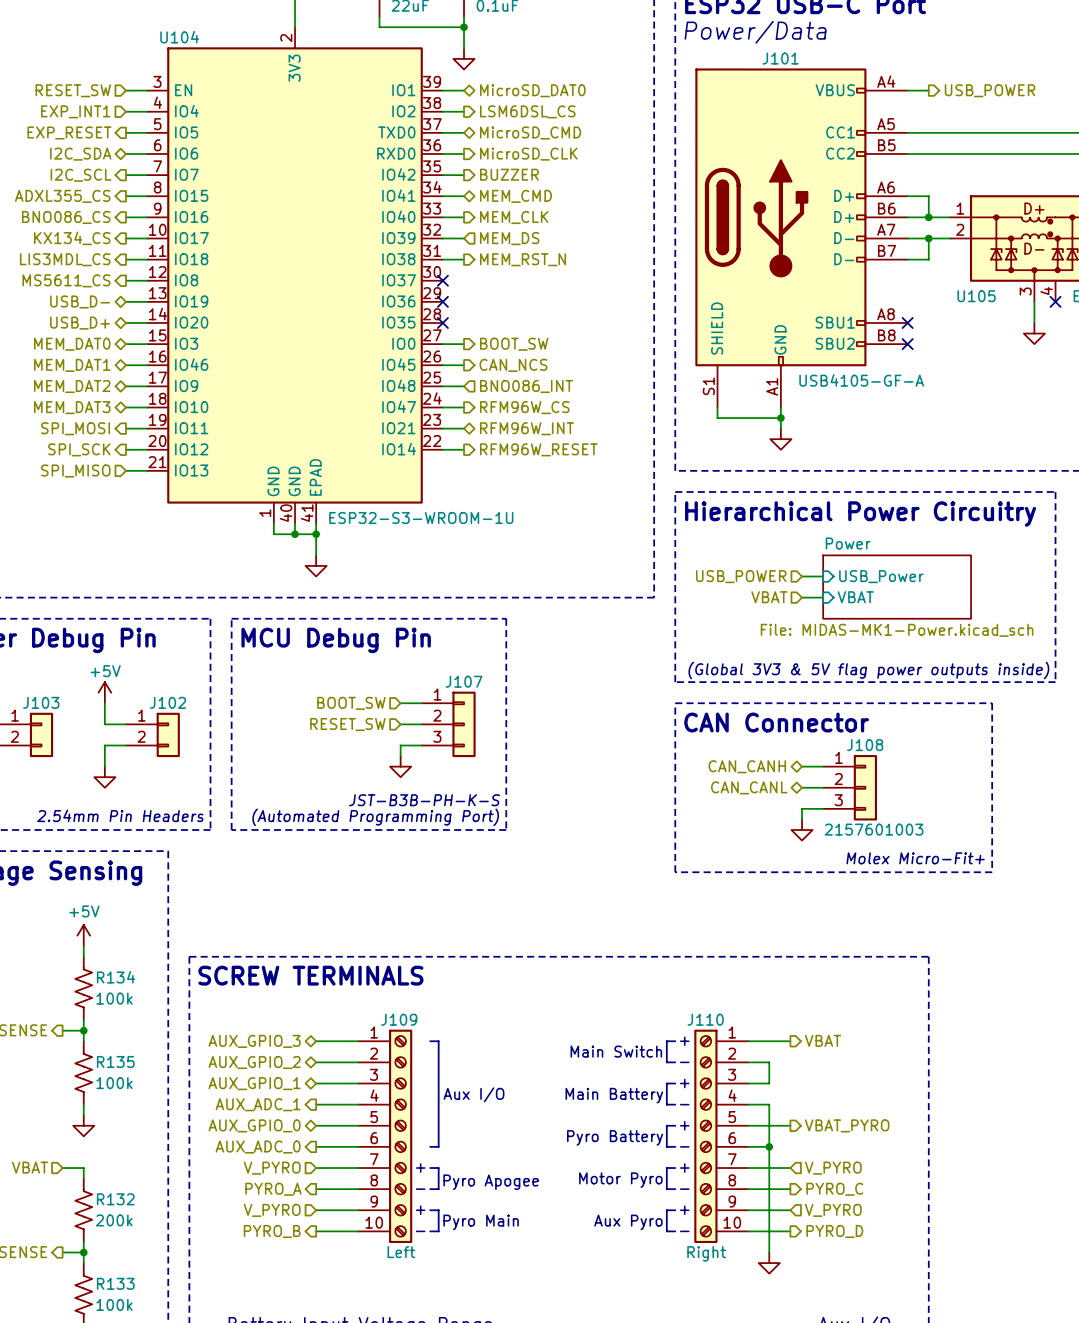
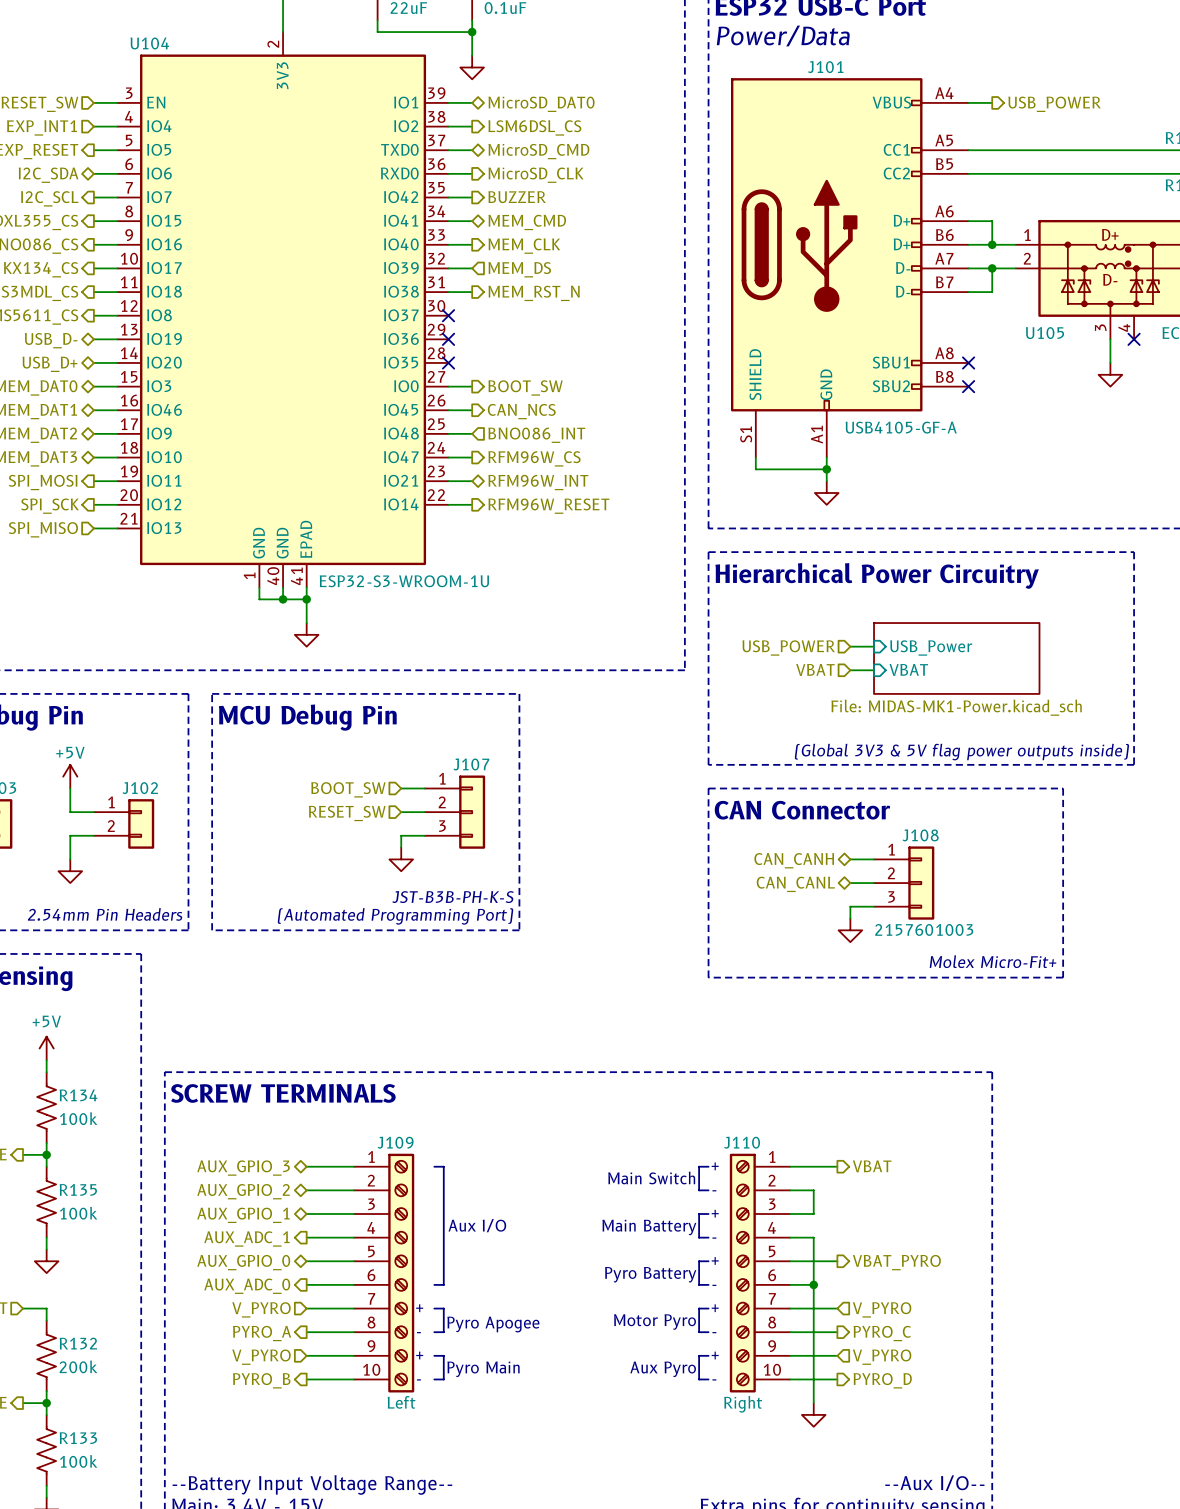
sheet Power name: Power (848, 543) -> none

